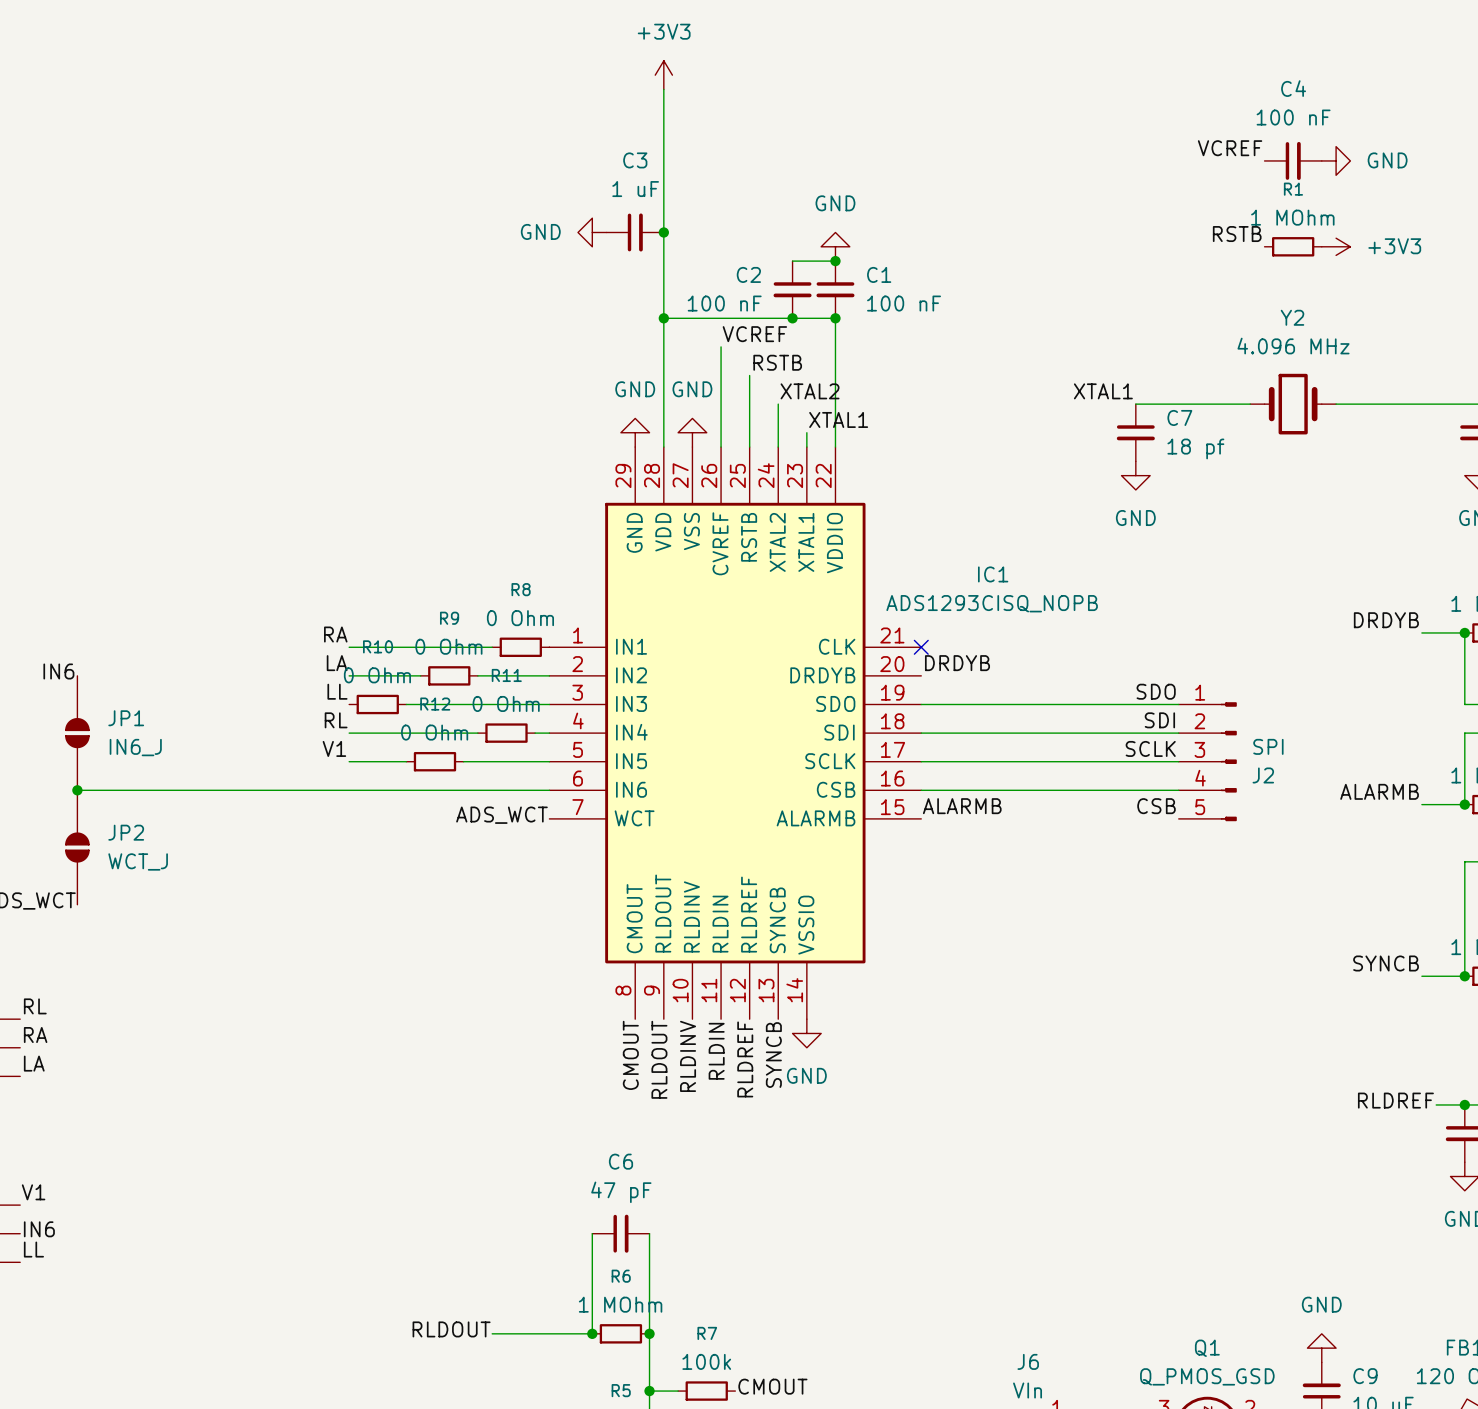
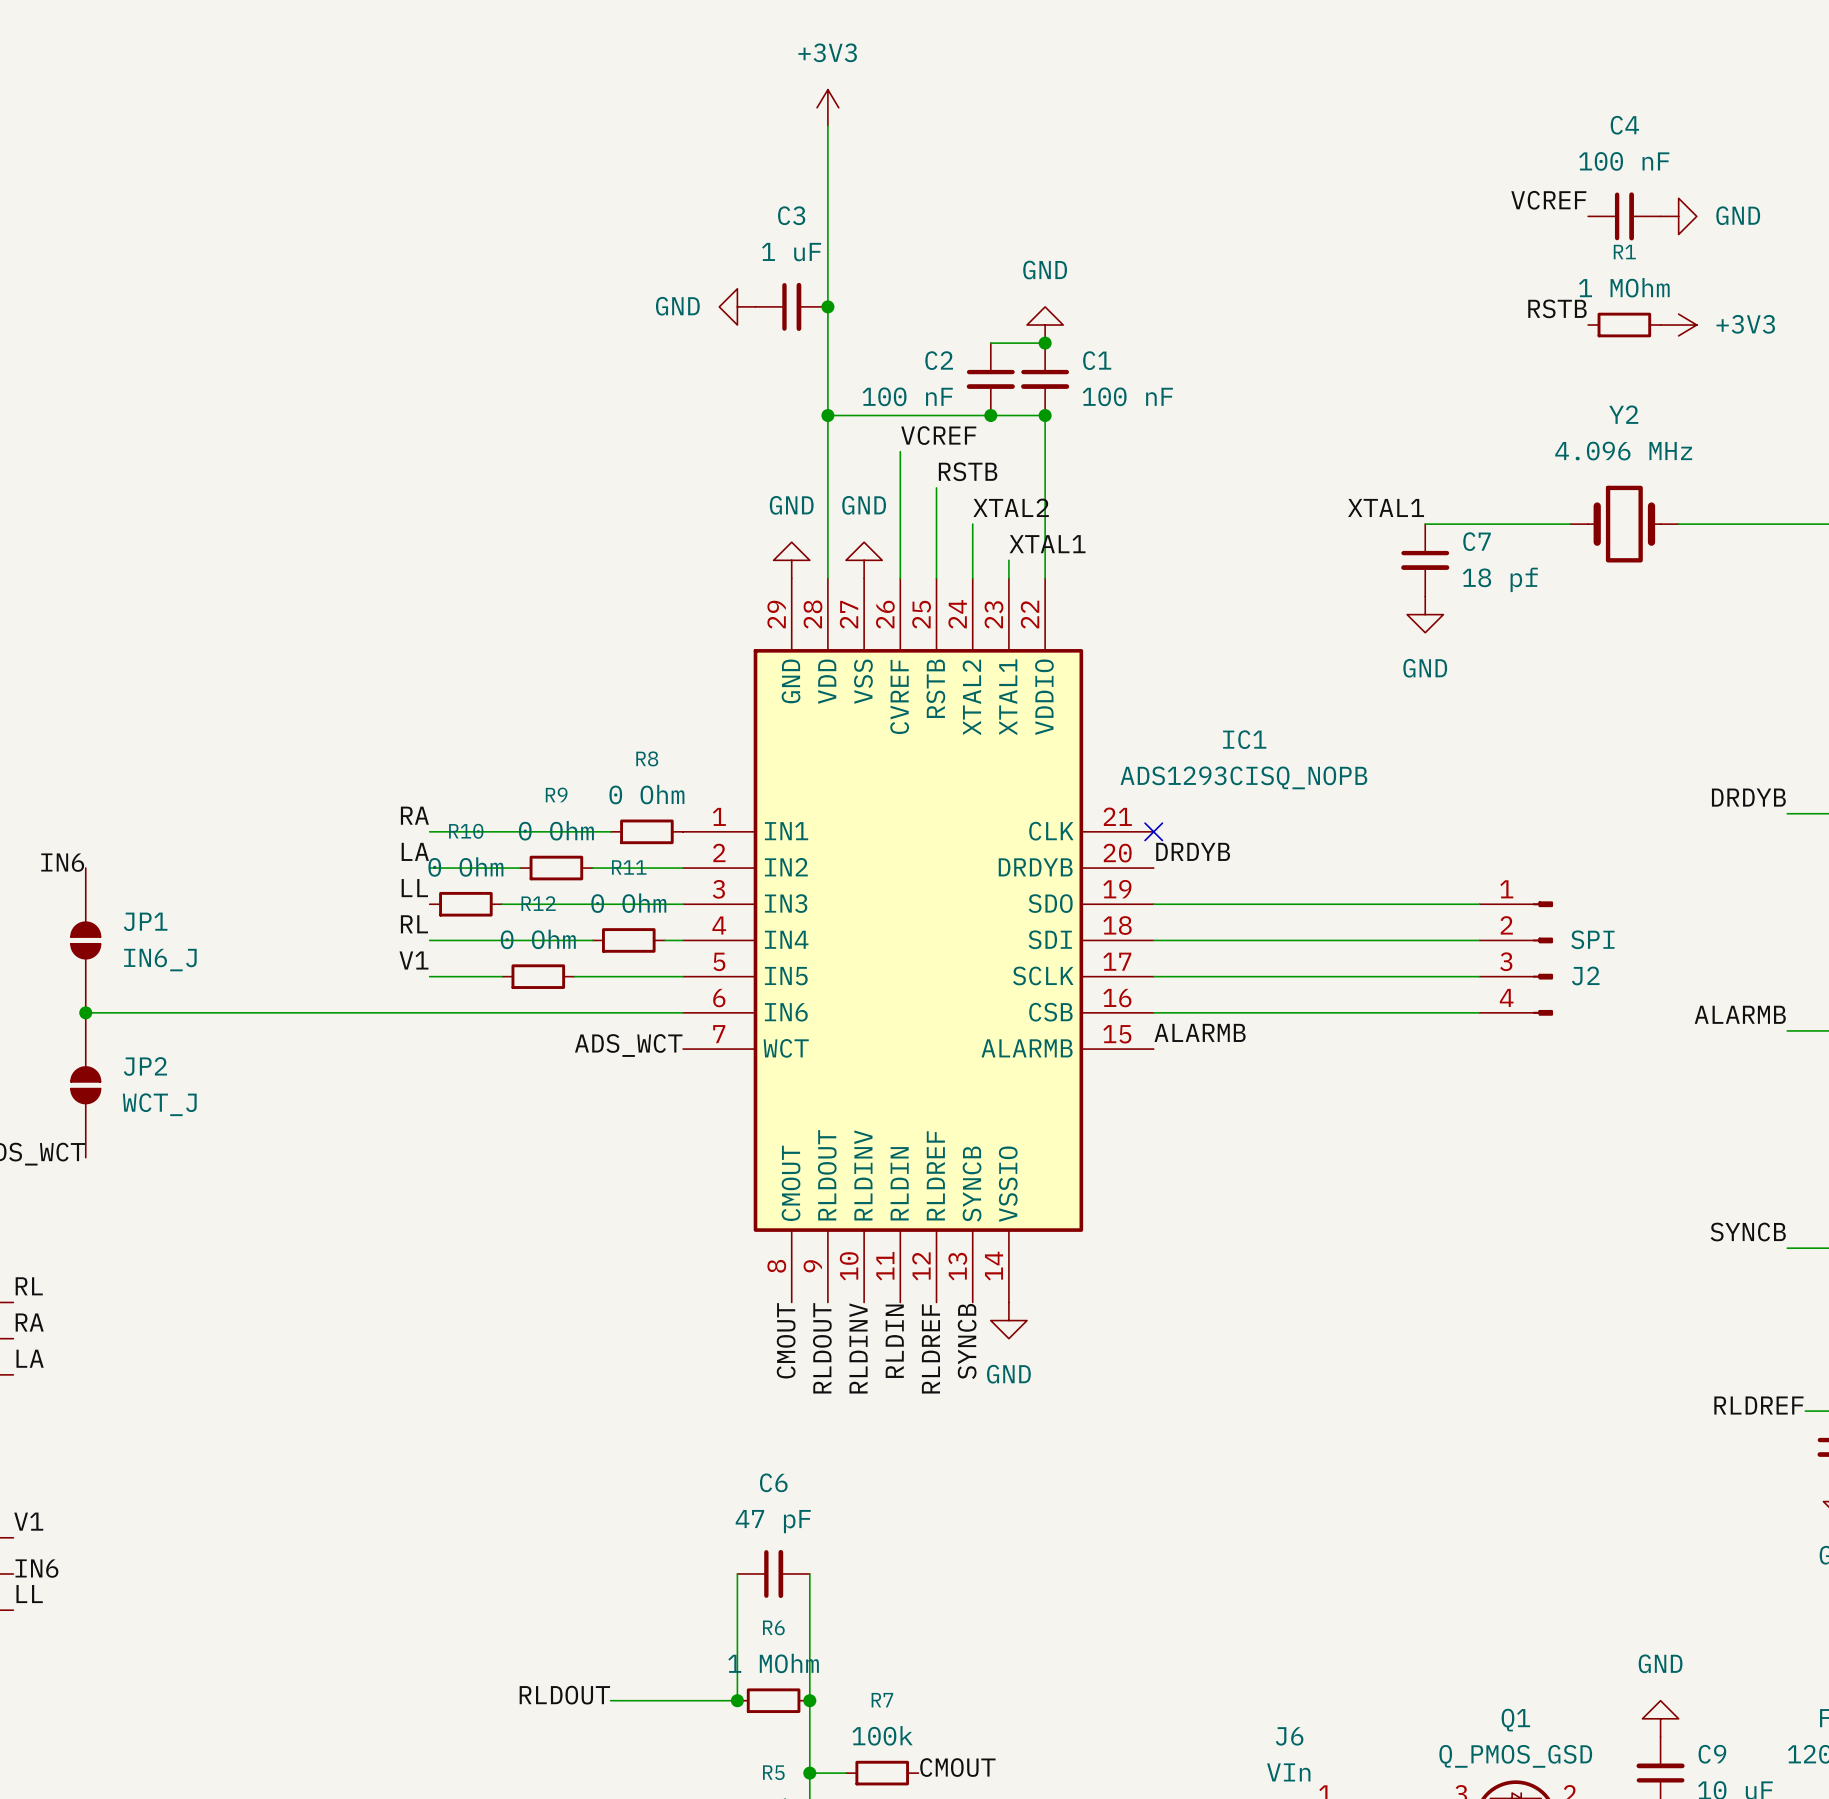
label: SDO (1156, 691) -> none
J2 symbol: [1178, 702, 1237, 822] -> [1479, 901, 1554, 1016]
label: SDI (1159, 720) -> none
label: SCLK (1150, 748) -> none
label: CSB (1156, 806) -> none

